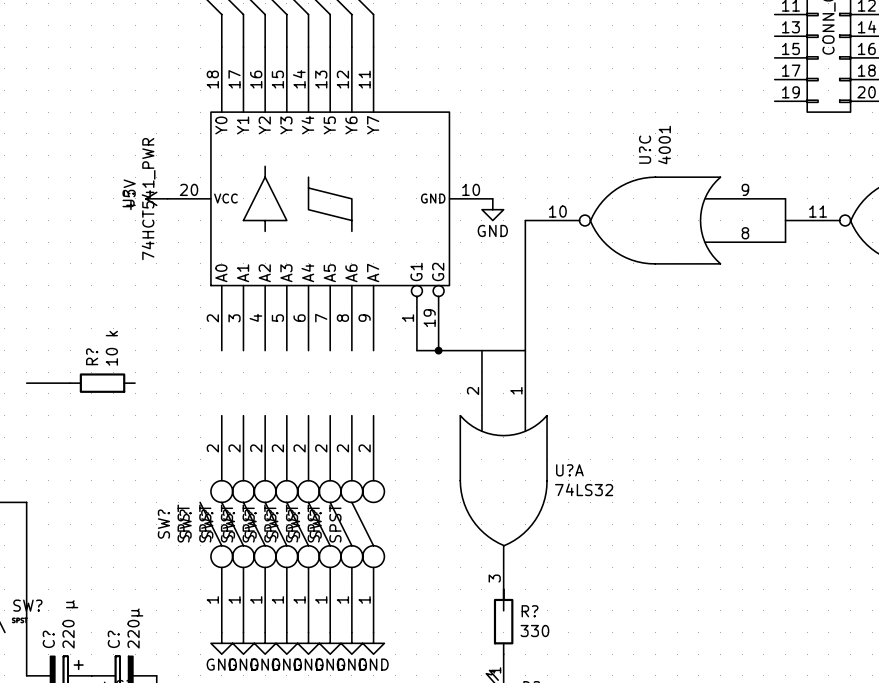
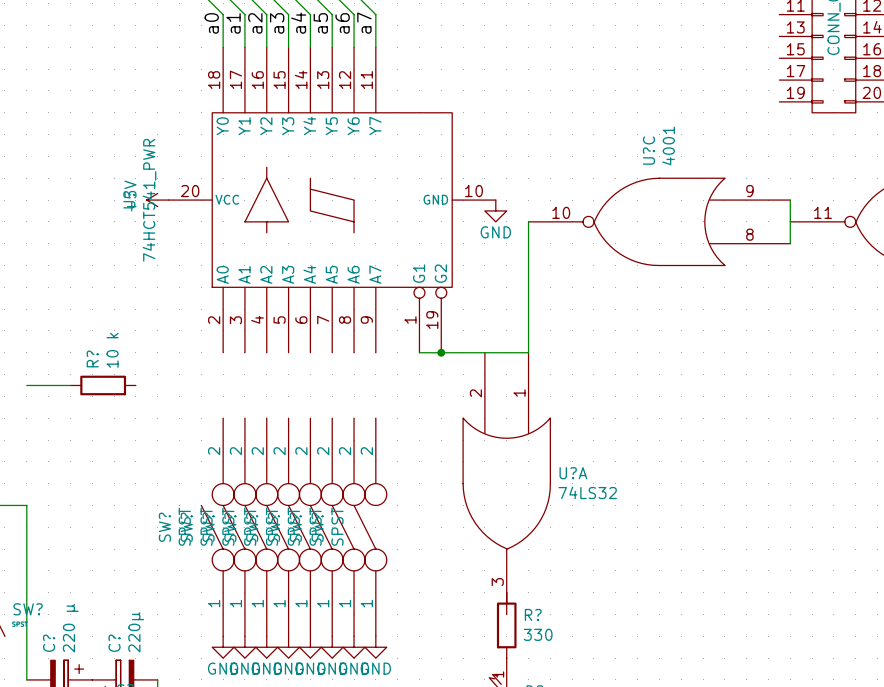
label: none -> a4 (298, 23)
label: none -> a7 (364, 23)
label: none -> a0 (211, 23)
label: none -> a1 (233, 23)
label: none -> a2 (255, 23)
label: none -> a3 (277, 23)
label: none -> a5 (320, 23)
label: none -> a6 (342, 23)

